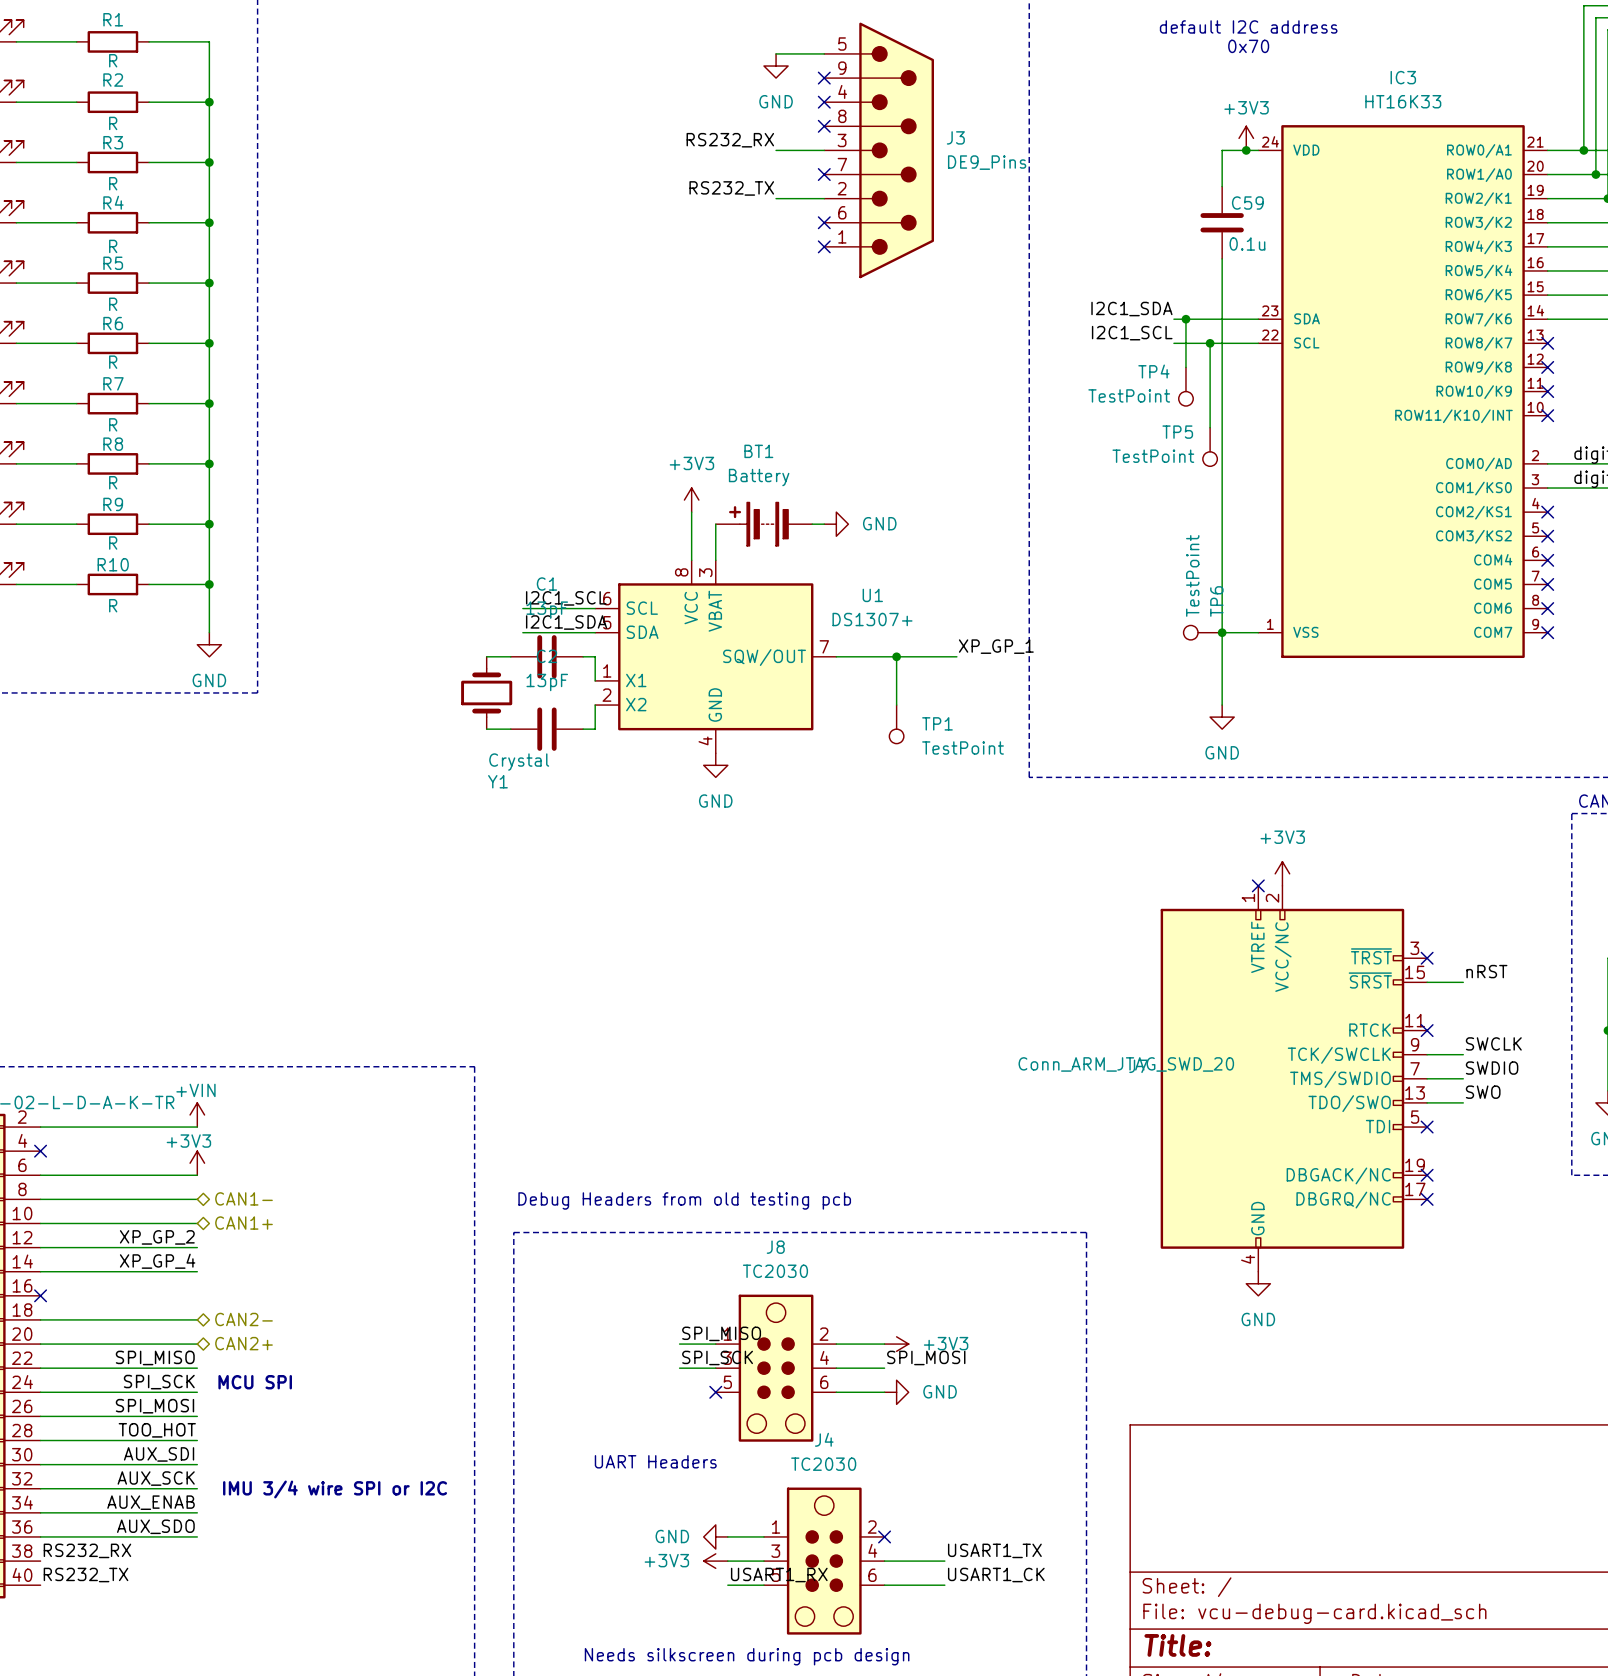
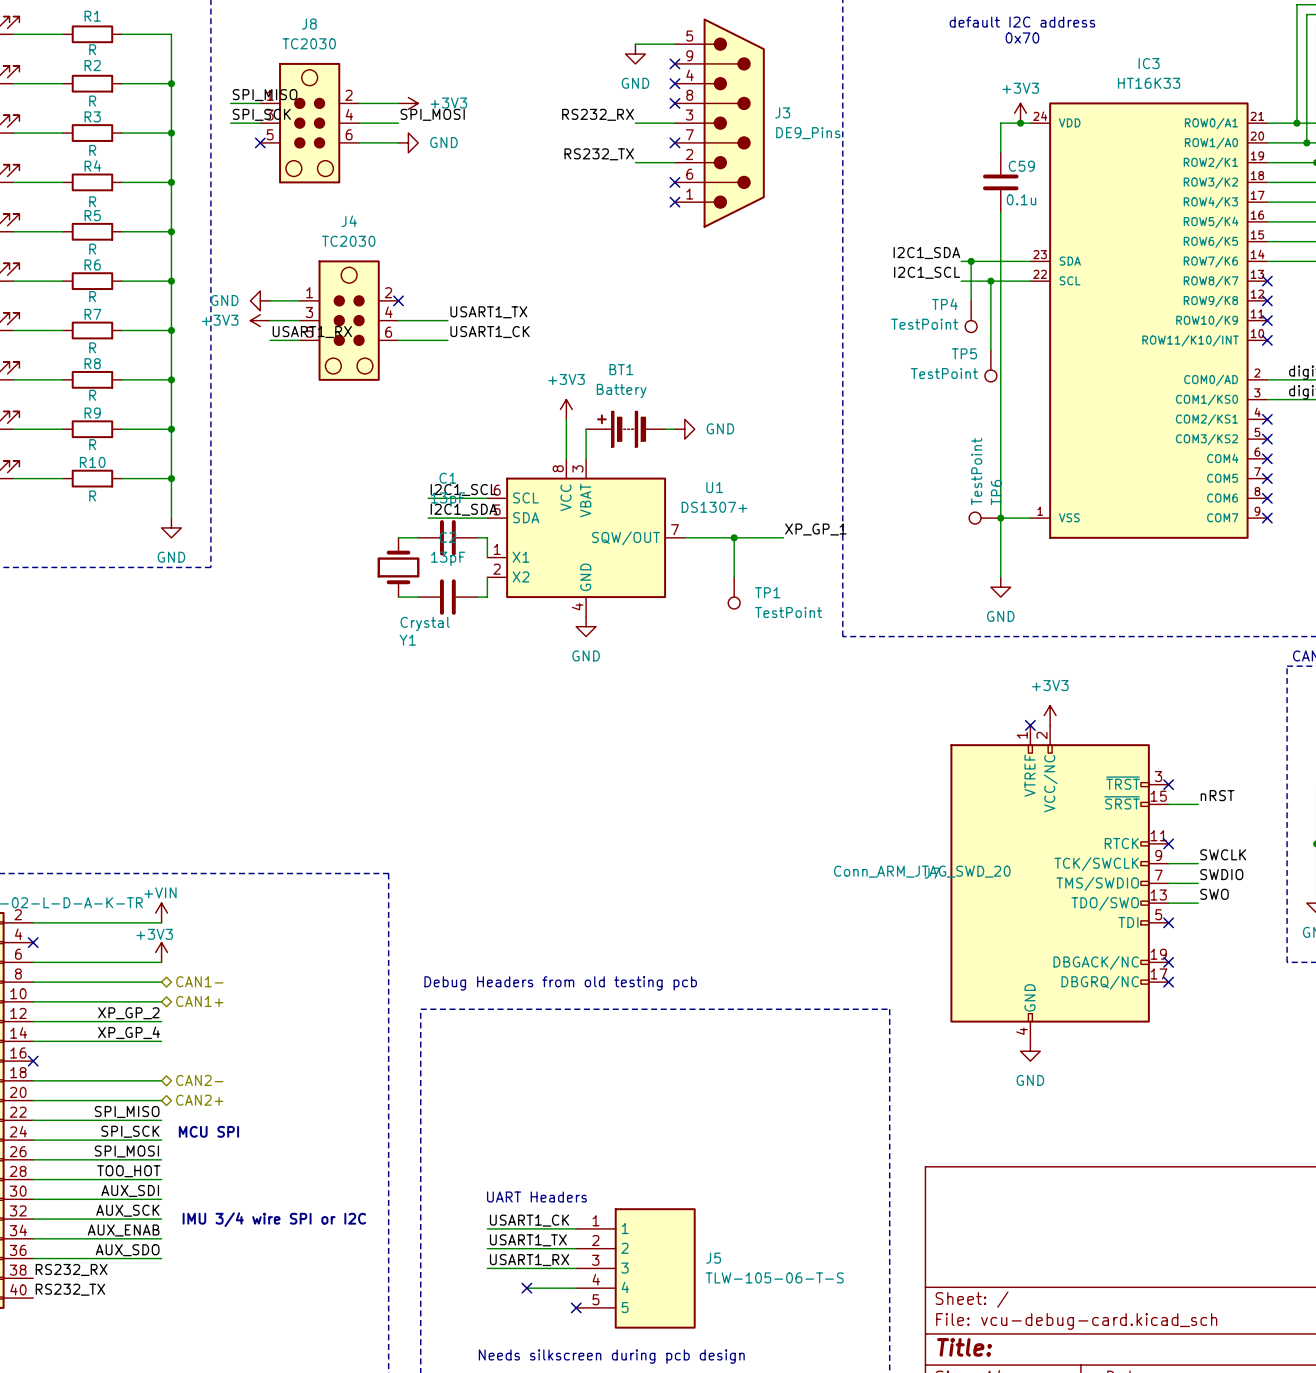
label: none -> SPI_MISO (265, 95)
wire: none -> (230, 103) (260, 103)
wire: none -> (359, 103) (398, 103)
power symbol: none -> +3V3 (408, 103)
label: none -> SPI_SCK (261, 114)
label: none -> SPI_MOSI (432, 114)
wire: none -> (230, 123) (260, 123)
wire: none -> (359, 123) (398, 123)
no-connect mark: none -> (260, 142)
wire: none -> (359, 142) (398, 142)
power symbol: none -> GND (408, 142)
power symbol: none -> GND (260, 300)
wire: none -> (270, 300) (299, 300)
no-connect mark: none -> (398, 300)
label: none -> USART1_TX (488, 312)
power symbol: none -> +3V3 (260, 320)
wire: none -> (270, 320) (299, 320)
wire: none -> (398, 320) (447, 320)
label: none -> USART1_RX (312, 332)
label: none -> USART1_CK (490, 332)
wire: none -> (270, 340) (299, 340)
wire: none -> (398, 340) (447, 340)
label: SPI_MISO (721, 1333) -> none
wire: (679, 1344) (715, 1344) -> none
wire: (836, 1344) (884, 1344) -> none
power symbol: +3V3 (896, 1344) -> none
label: SPI_SCK (717, 1357) -> none
label: SPI_MOSI (926, 1357) -> none
wire: (679, 1368) (715, 1368) -> none
J8 position: (776, 1368) -> (309, 123)
wire: (836, 1368) (884, 1368) -> none
no-connect mark: (715, 1392) -> none
wire: (836, 1392) (884, 1392) -> none
power symbol: GND (896, 1392) -> none
label: none -> USART1_CK (529, 1220)
wire: none -> (487, 1228) (576, 1228)
label: none -> USART1_TX (528, 1240)
wire: none -> (487, 1248) (576, 1248)
power symbol: GND (715, 1536) -> none
wire: (727, 1536) (763, 1536) -> none
no-connect mark: (884, 1536) -> none
wire: none -> (487, 1268) (576, 1268)
J5: none -> TLW-105-06-T-S (635, 1268)
label: USART1_TX (994, 1550) -> none
power symbol: +3V3 (715, 1561) -> none
wire: (727, 1561) (763, 1561) -> none
J4 position: (824, 1561) -> (349, 320)
wire: (884, 1561) (944, 1561) -> none
wire: none -> (526, 1288) (576, 1288)
no-connect mark: none -> (526, 1288)
label position: USART1_RX (779, 1575) -> USART1_RX (529, 1260)
label: USART1_CK (996, 1575) -> none
wire: (727, 1585) (763, 1585) -> none
wire: (884, 1585) (944, 1585) -> none
no-connect mark: none -> (576, 1307)

